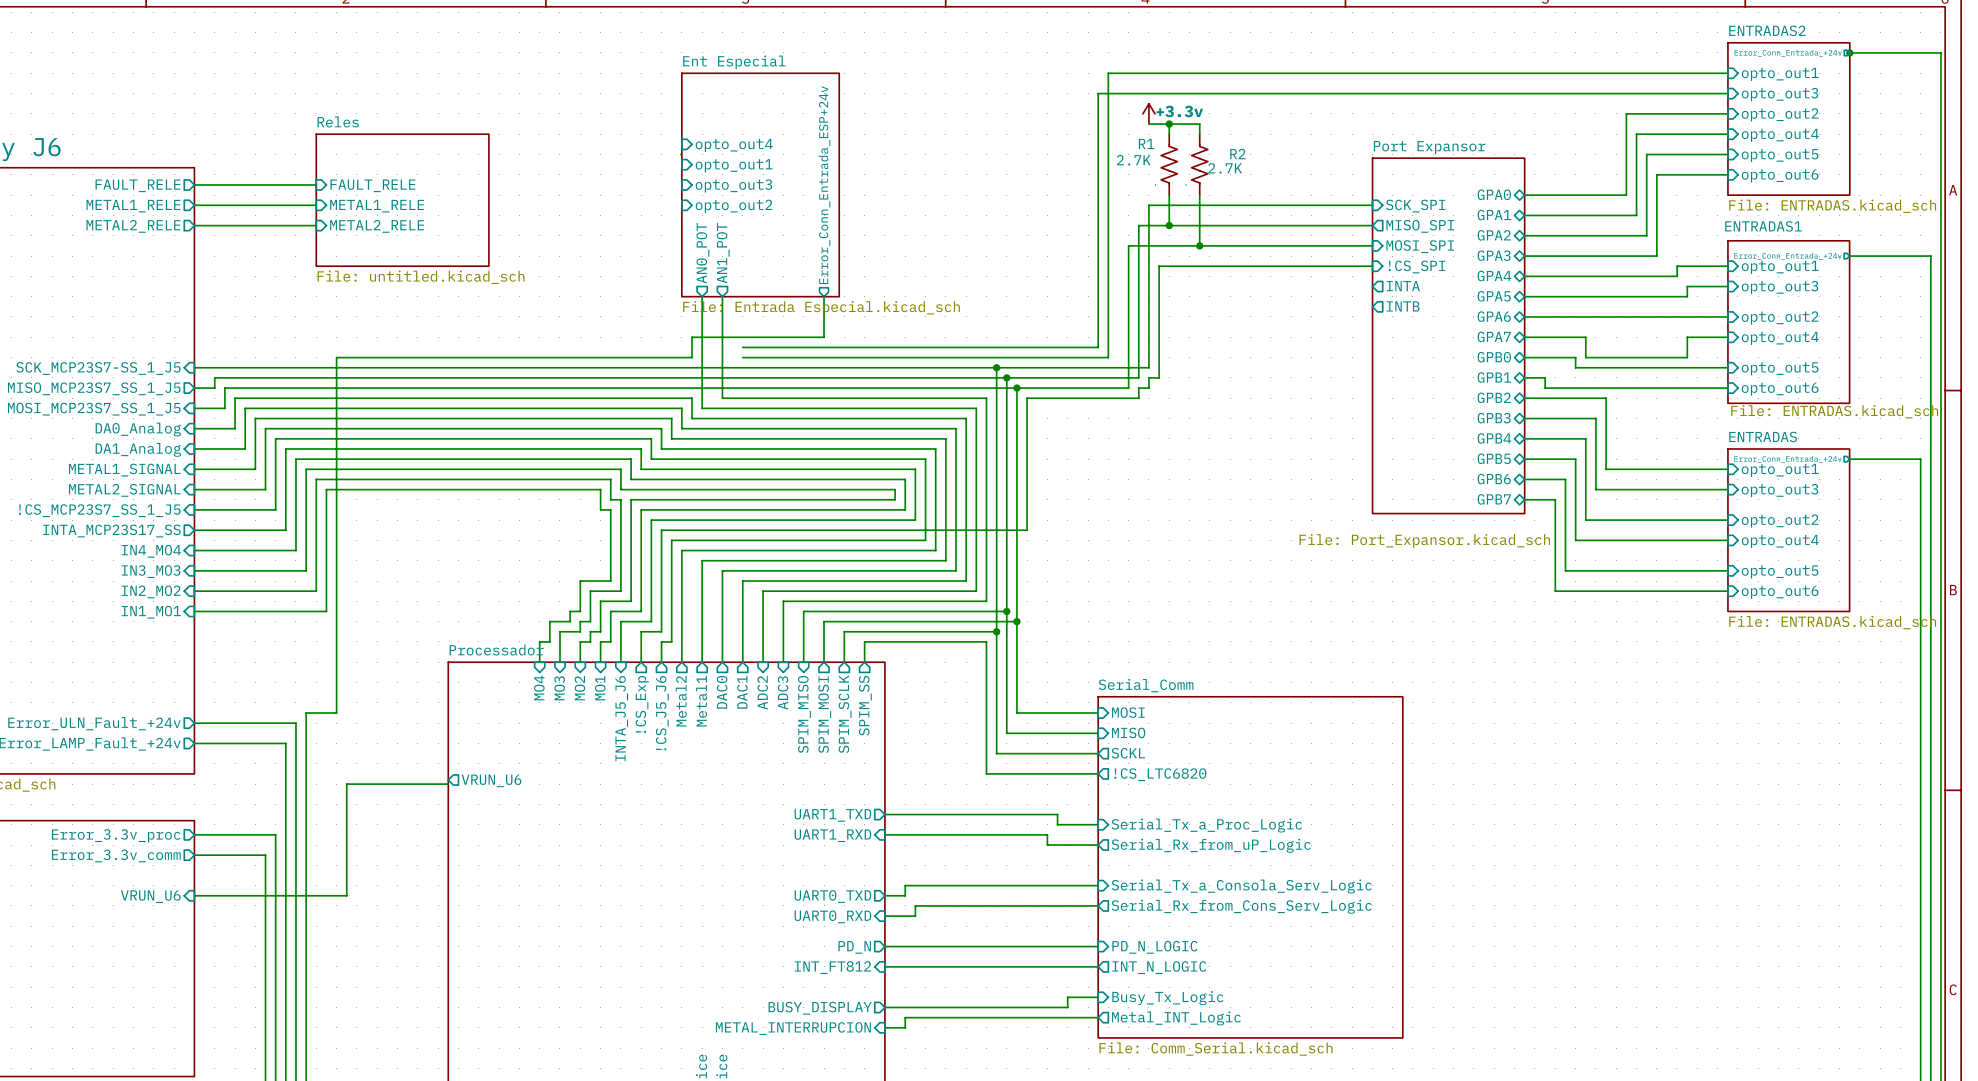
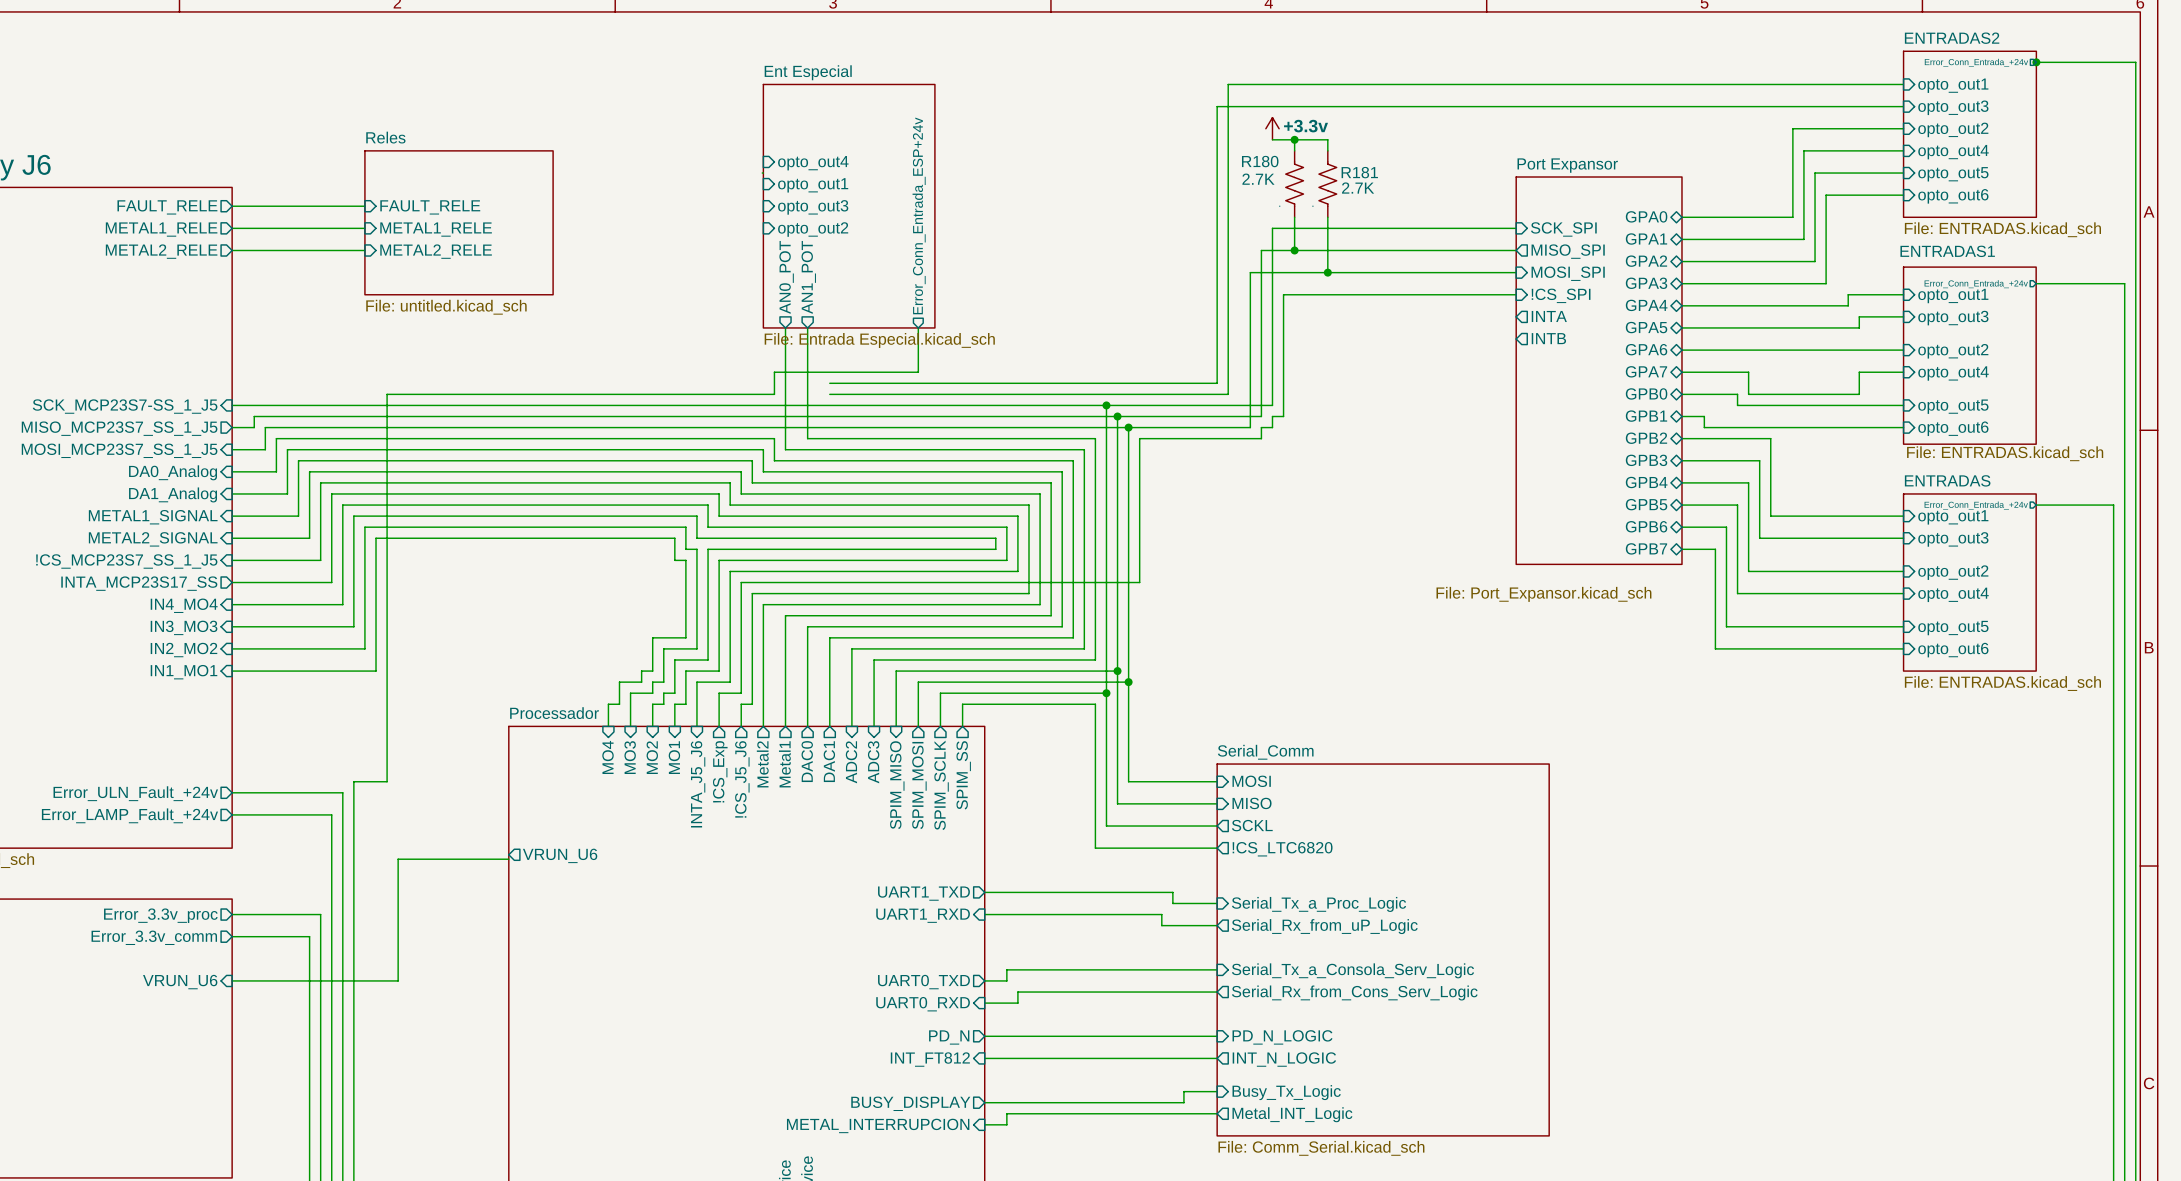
R1 name: R1 (1146, 143) -> R180 (1260, 161)
R2 name: R2 (1237, 154) -> R181 (1359, 172)

